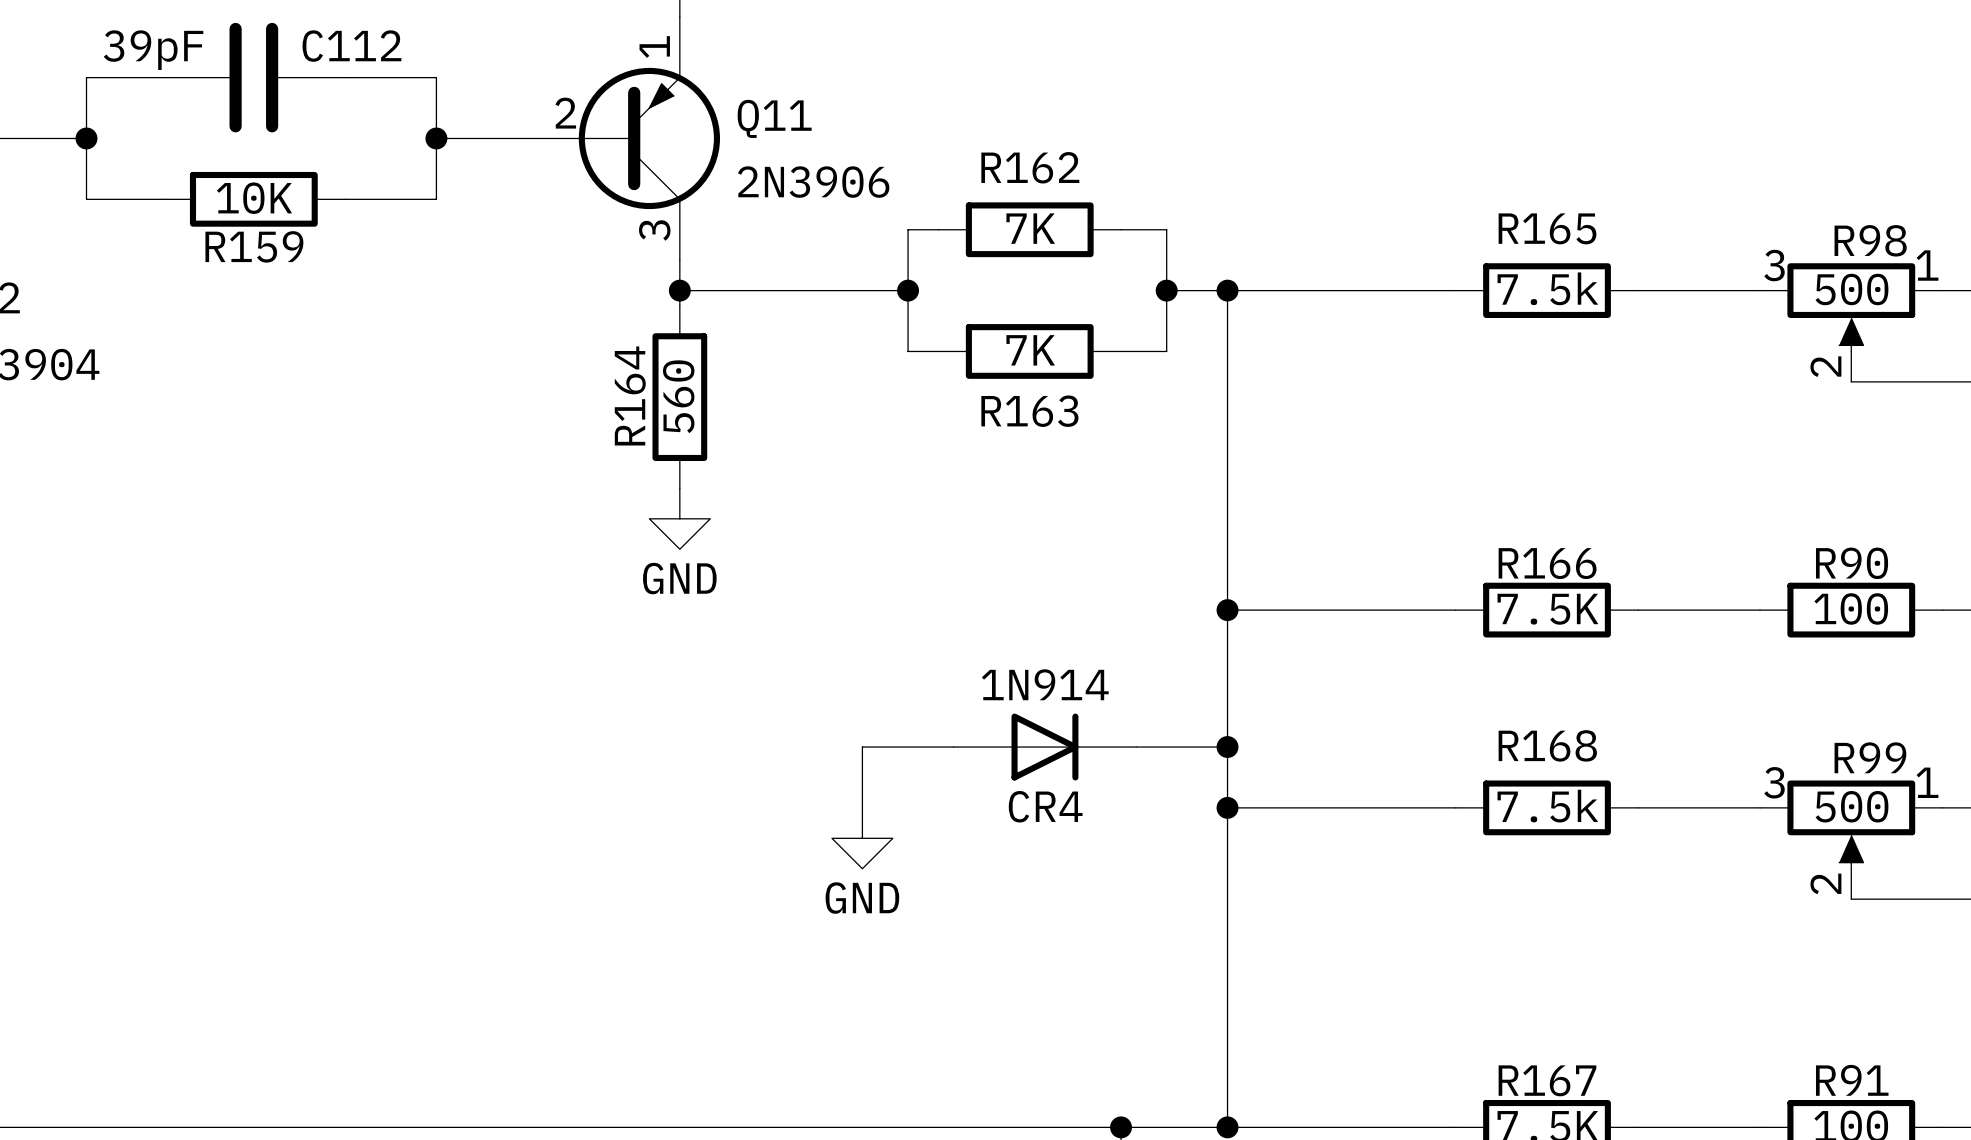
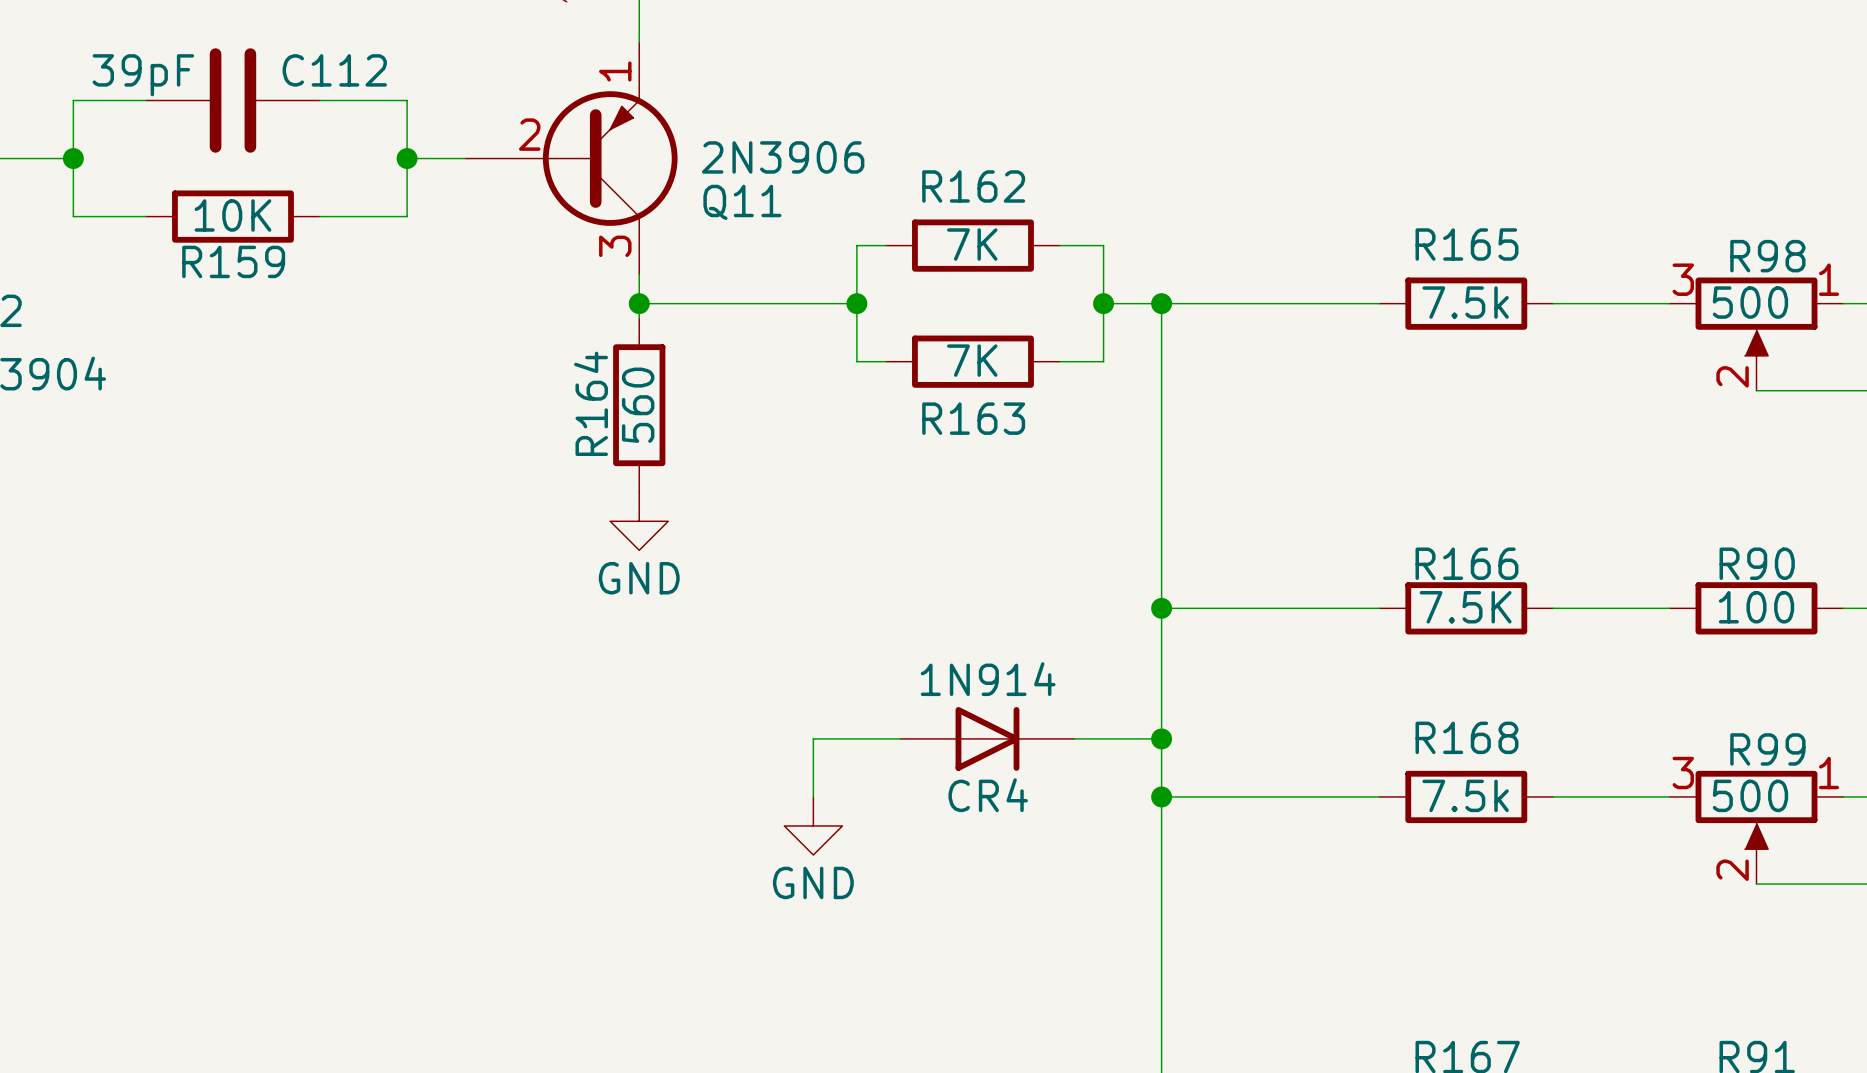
Q11 name position: Q11 (774, 118) -> Q11 (742, 202)
Q11 value position: 2N3906 (813, 182) -> 2N3906 (783, 157)

